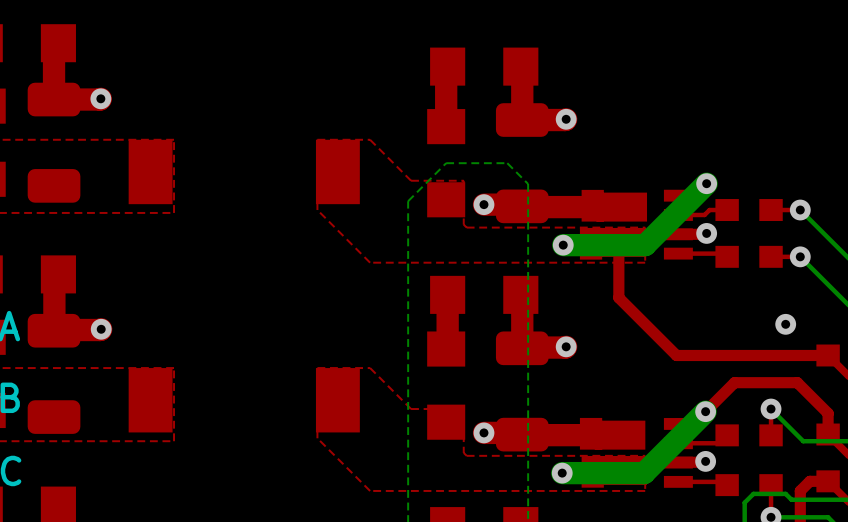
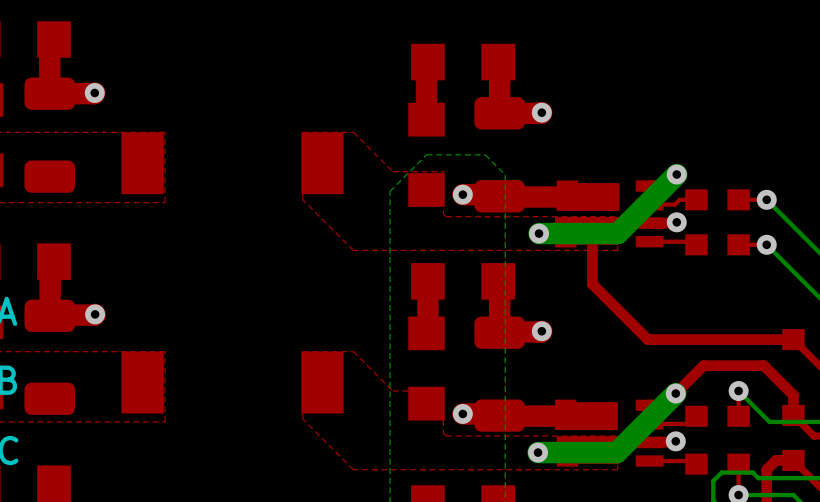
via: (785, 324) -> none

